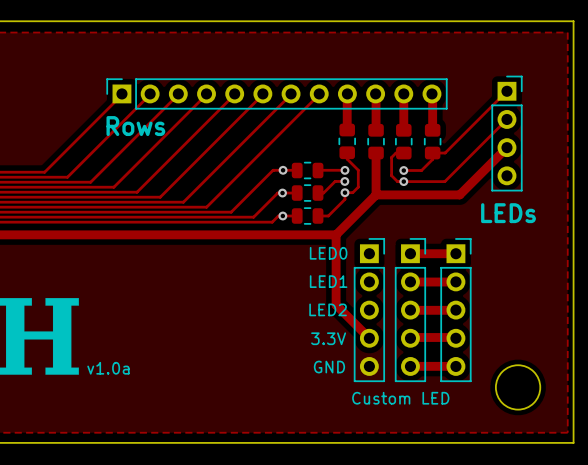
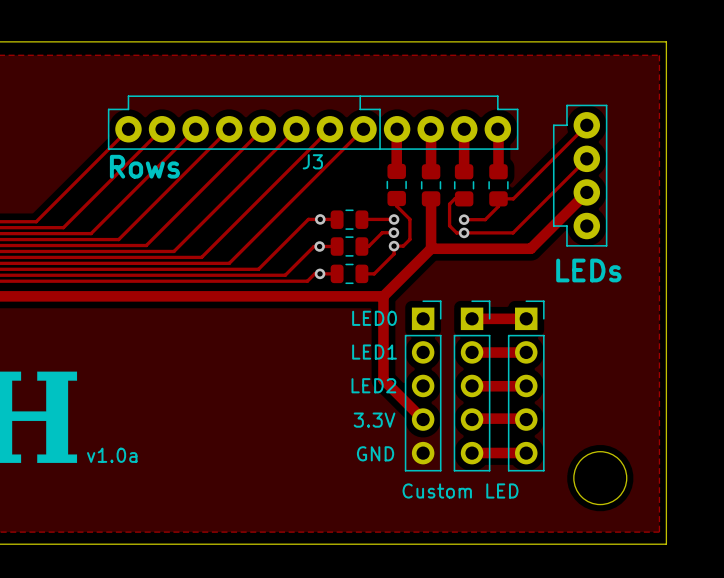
part footprint: [491, 75, 523, 192] -> [552, 104, 608, 247]
J3: none -> (313, 122)
part: (276, 93) -> none

